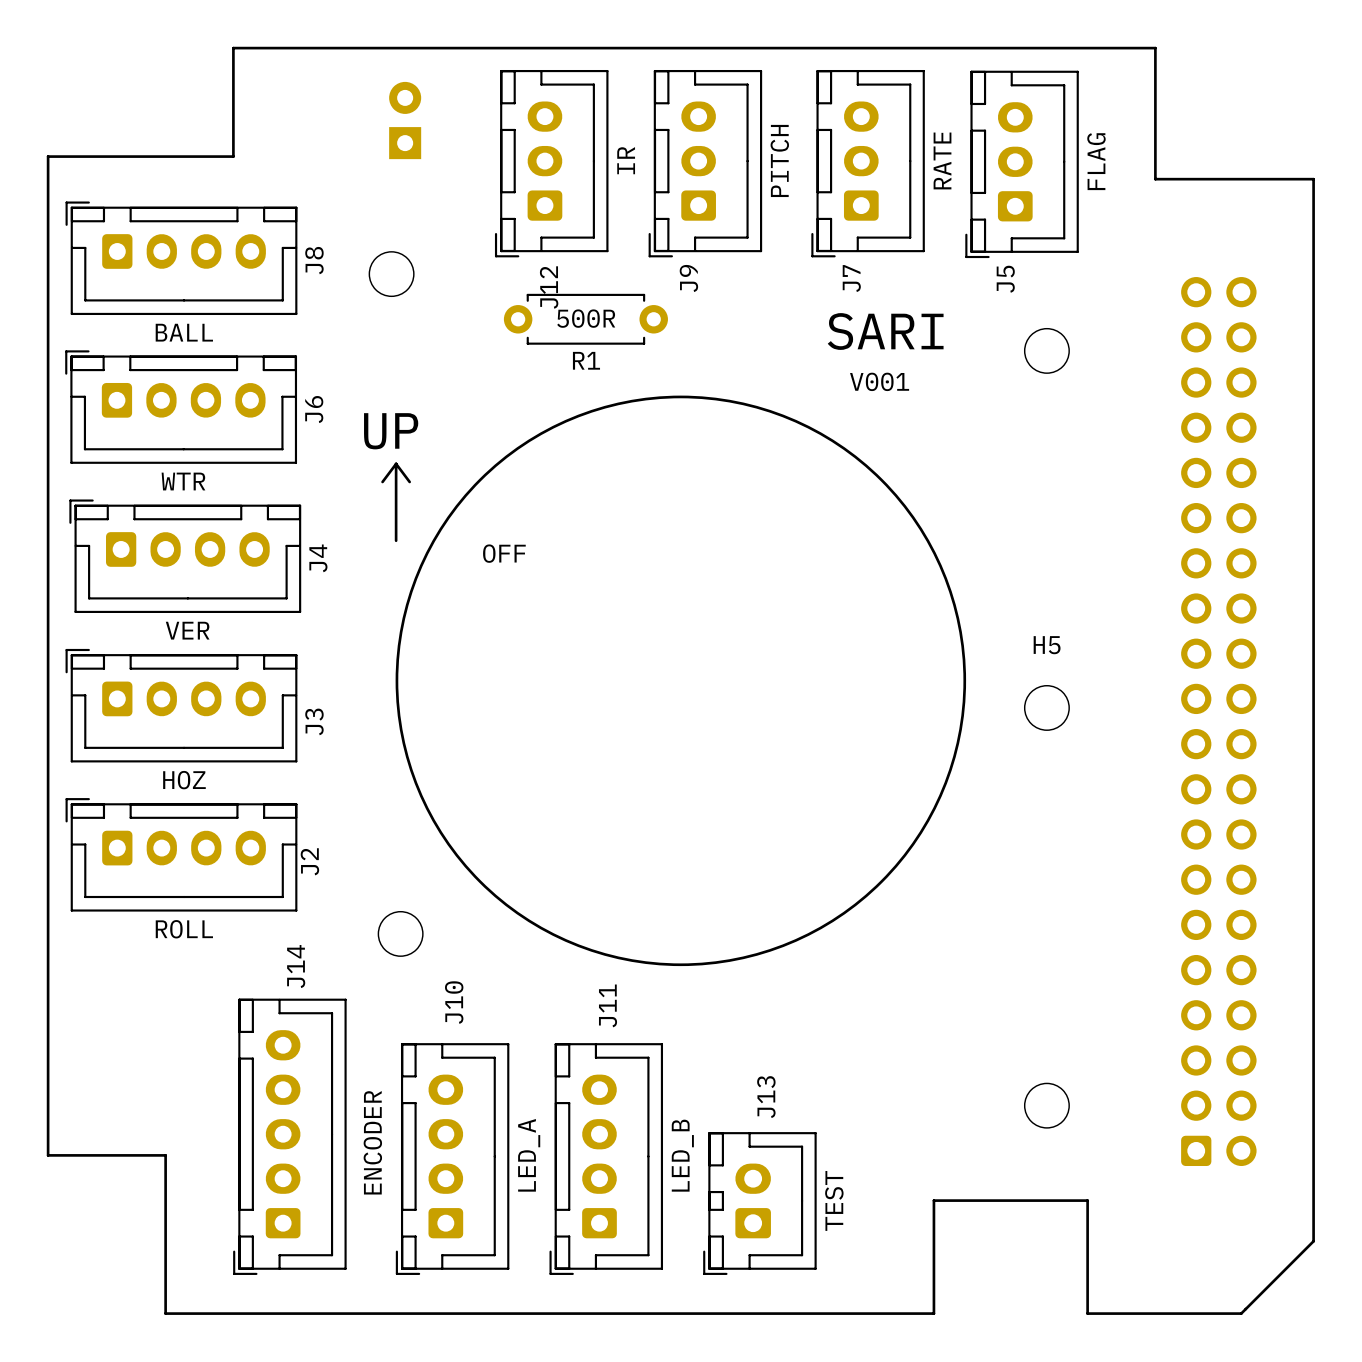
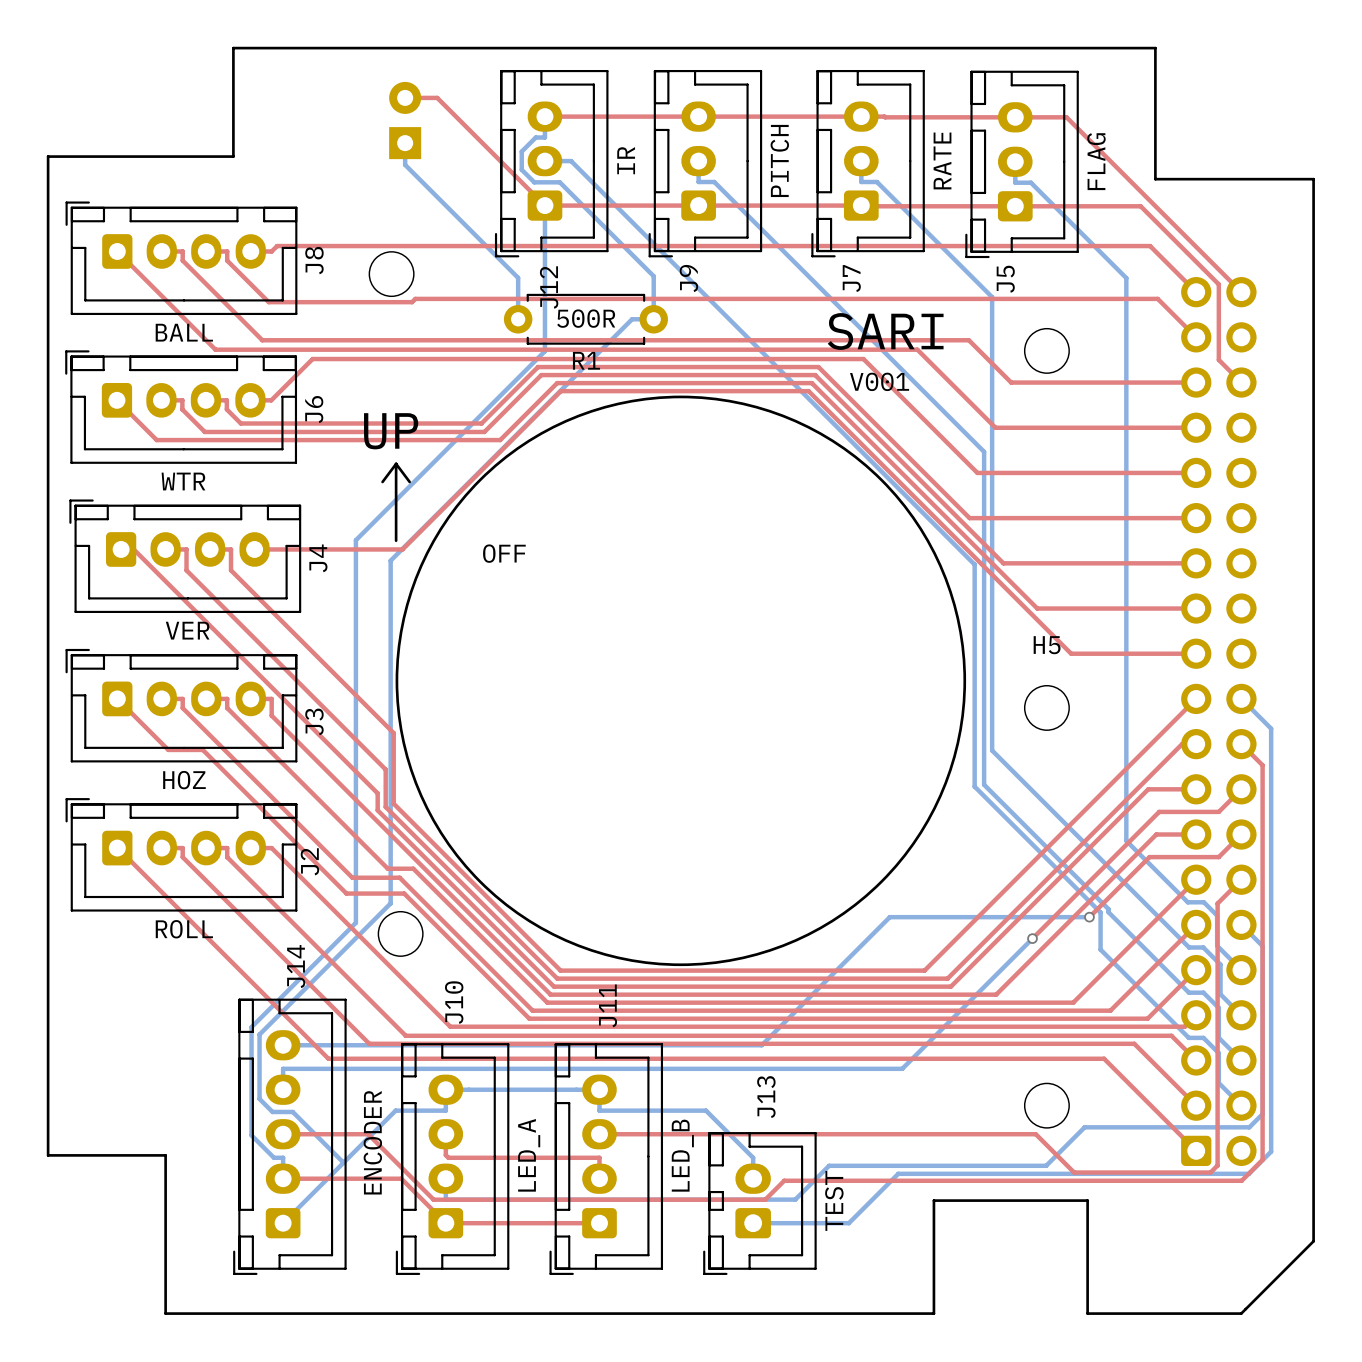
top track: none -> (405, 97) (437, 97) (544, 205) (1140, 206) (1218, 284) (1218, 359) (1241, 382)
top track: none -> (544, 116) (1066, 117) (1241, 292)
bottom track: none -> (544, 116) (544, 137) (535, 137) (521, 151) (521, 169) (534, 182) (559, 182) (653, 276) (653, 319) (632, 319) (390, 560) (390, 903) (259, 1034) (259, 1098) (272, 1111) (292, 1111) (343, 1162)
bottom track: none -> (405, 143) (405, 164) (518, 277) (518, 319)
bottom track: none -> (544, 161) (571, 161) (974, 564) (974, 786) (1100, 912) (1100, 949) (1188, 1037) (1203, 1037) (1218, 1053) (1218, 1083) (1241, 1105)
bottom track: none -> (698, 161) (698, 182) (714, 182) (984, 451) (984, 784) (1188, 992) (1203, 992) (1218, 1008) (1218, 1037) (1241, 1060)
bottom track: none -> (861, 161) (861, 182) (877, 182) (992, 297) (992, 750) (1189, 947) (1203, 947) (1220, 964) (1220, 994) (1241, 1015)
bottom track: none -> (1015, 161) (1015, 182) (1030, 182) (1126, 278) (1126, 840) (1187, 902) (1203, 902) (1217, 915) (1217, 945) (1241, 970)
bottom track: none -> (544, 205) (544, 351) (355, 540) (355, 922) (251, 1027) (251, 1135) (273, 1157) (283, 1157) (283, 1178)
top track: none -> (117, 251) (215, 349) (917, 349) (995, 427) (1196, 427)
top track: none -> (161, 251) (182, 251) (182, 260) (262, 340) (968, 340) (1011, 382) (1196, 382)
top track: none -> (206, 251) (227, 251) (227, 260) (268, 302) (412, 302) (415, 298) (1157, 298) (1196, 337)
top track: none -> (250, 251) (271, 251) (277, 246) (1150, 246) (1196, 292)
top track: none -> (116, 400) (156, 440) (500, 440) (557, 383) (811, 383) (1037, 608) (1196, 608)
top track: none -> (161, 400) (182, 400) (182, 409) (204, 431) (484, 431) (541, 375) (815, 375) (1003, 563) (1196, 563)
top track: none -> (205, 400) (226, 400) (226, 409) (240, 423) (481, 423) (538, 367) (818, 367) (969, 518) (1196, 518)
top track: none -> (250, 400) (271, 400) (312, 359) (863, 359) (977, 472) (1196, 472)
top track: none -> (121, 549) (133, 549) (377, 793) (377, 810) (553, 986) (950, 986) (1148, 789) (1196, 789)
top track: none -> (165, 549) (186, 549) (186, 570) (385, 769) (385, 807) (557, 978) (947, 978) (1182, 744) (1196, 744)
top track: none -> (210, 549) (231, 549) (231, 570) (393, 733) (393, 803) (560, 970) (924, 970) (1196, 698)
top track: none -> (254, 549) (402, 549) (560, 391) (808, 391) (1071, 653) (1196, 653)
top track: none -> (117, 698) (168, 749) (202, 749) (346, 893) (404, 893) (529, 1018) (1147, 1018) (1196, 970)
top track: none -> (161, 698) (182, 698) (182, 708) (352, 877) (399, 877) (532, 1010) (1110, 1010) (1196, 924)
top track: none -> (206, 698) (227, 698) (227, 708) (387, 868) (413, 868) (547, 1002) (1073, 1002) (1196, 879)
top track: none -> (250, 698) (271, 698) (271, 715) (550, 994) (996, 994) (1156, 834) (1196, 834)
bottom track: none -> (1241, 698) (1271, 728) (1271, 1151) (1249, 1173) (898, 1173) (848, 1223) (753, 1223)
top track: none -> (1241, 744) (1262, 765) (1262, 1159) (1241, 1180) (784, 1180) (765, 1199) (433, 1199) (368, 1134) (283, 1134)
top track: none -> (1241, 789) (1218, 811) (1159, 811) (1032, 938)
top track: none -> (1241, 834) (1218, 857) (1149, 857) (1089, 917)
top track: none -> (117, 848) (328, 1058) (1104, 1058) (1196, 1150)
top track: none -> (161, 848) (182, 848) (182, 857) (369, 1043) (1134, 1043) (1196, 1105)
top track: none -> (206, 848) (227, 848) (227, 857) (405, 1035) (1171, 1035) (1196, 1060)
top track: none -> (250, 848) (271, 848) (450, 1026) (1184, 1026) (1196, 1015)
top track: none -> (1241, 879) (1217, 903) (1217, 1165) (1210, 1172) (1074, 1172) (1035, 1134) (599, 1134)
bottom track: none -> (1089, 917) (889, 917) (761, 1045) (283, 1045)
via: none -> (1089, 917)
bottom track: none -> (1241, 924) (1262, 946) (1262, 1114) (1249, 1127) (1084, 1127) (1046, 1165) (829, 1165) (795, 1199) (445, 1199) (445, 1178)
bottom track: none -> (1032, 938) (902, 1068) (283, 1068) (283, 1089)
via: none -> (1032, 938)
top track: none -> (445, 1134) (445, 1155) (448, 1157) (599, 1157) (599, 1178)
top track: none -> (283, 1178) (401, 1178) (445, 1223) (599, 1223)
bottom track: none -> (753, 1178) (753, 1157) (706, 1110) (599, 1110) (599, 1089) (445, 1089) (445, 1110) (395, 1110) (283, 1223)

